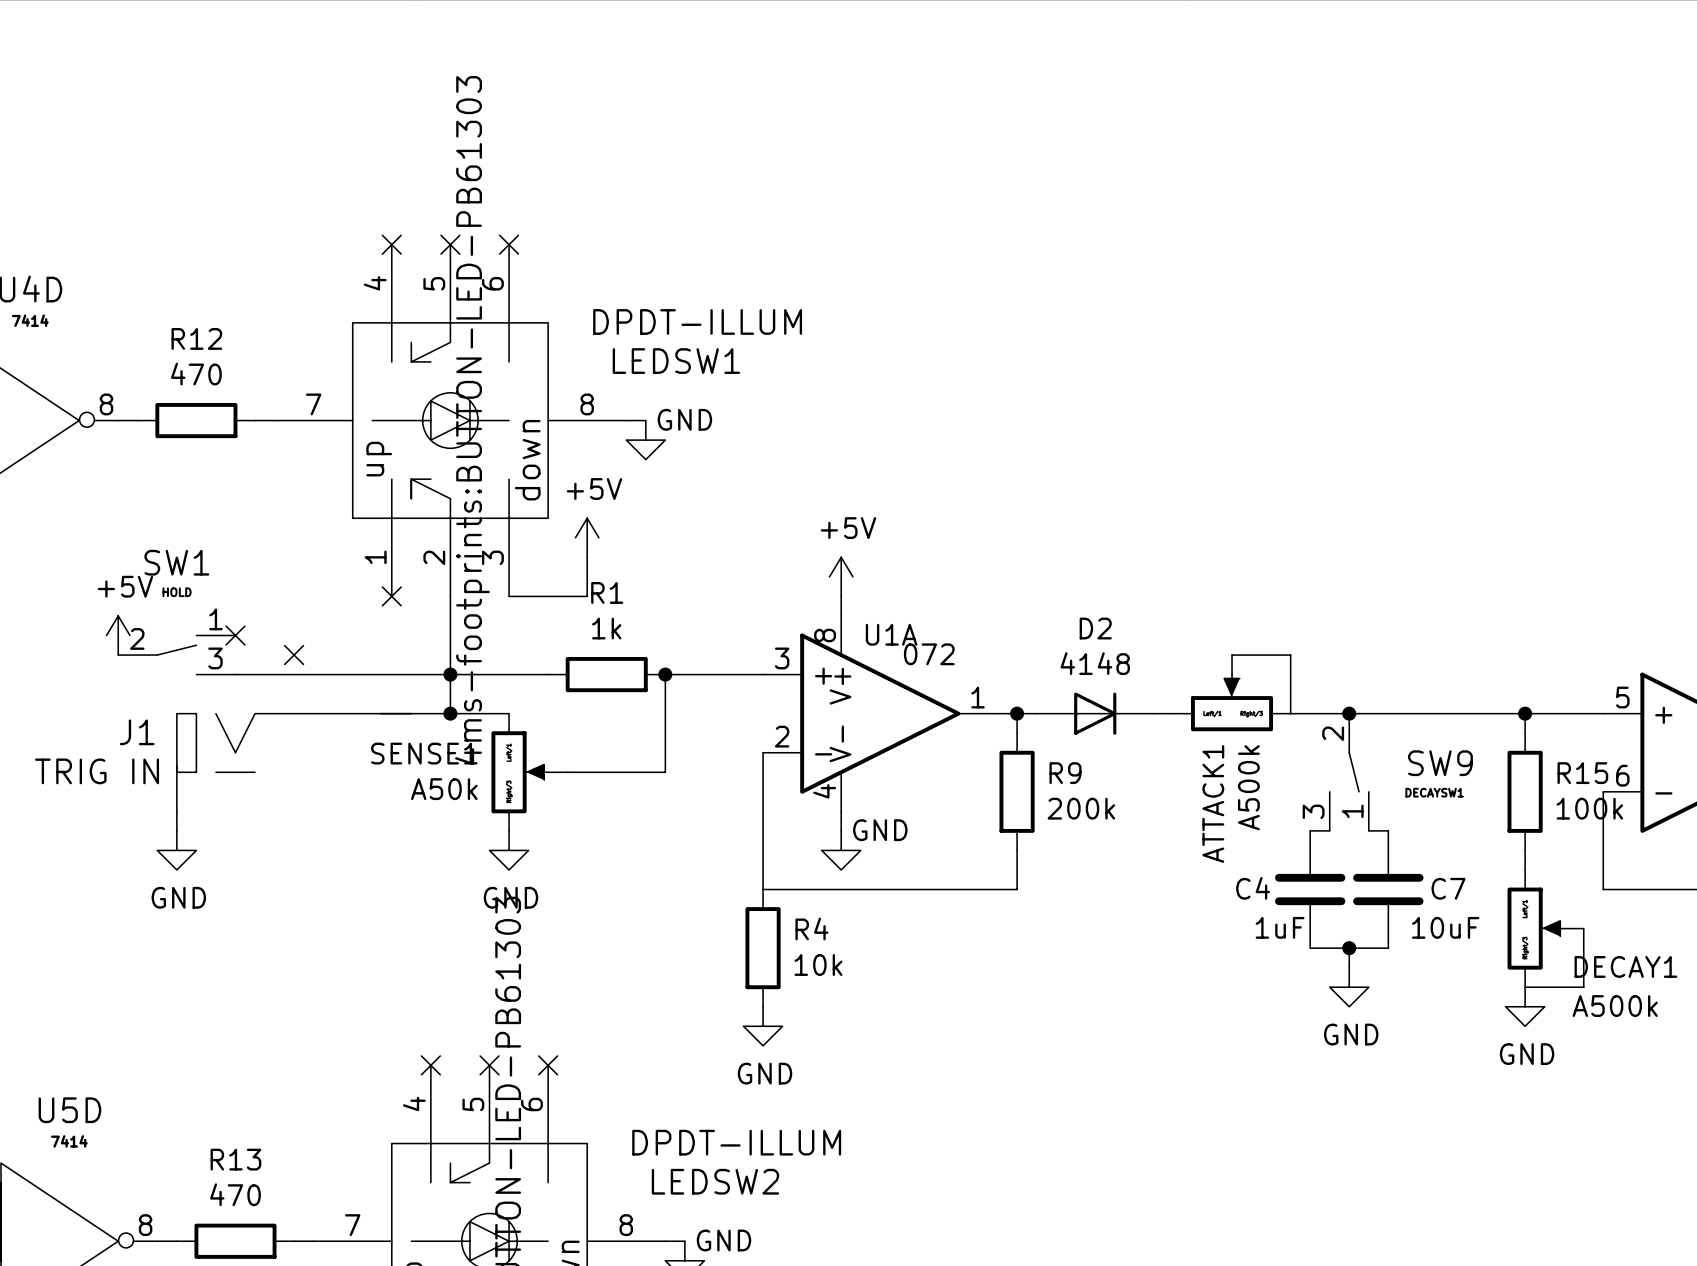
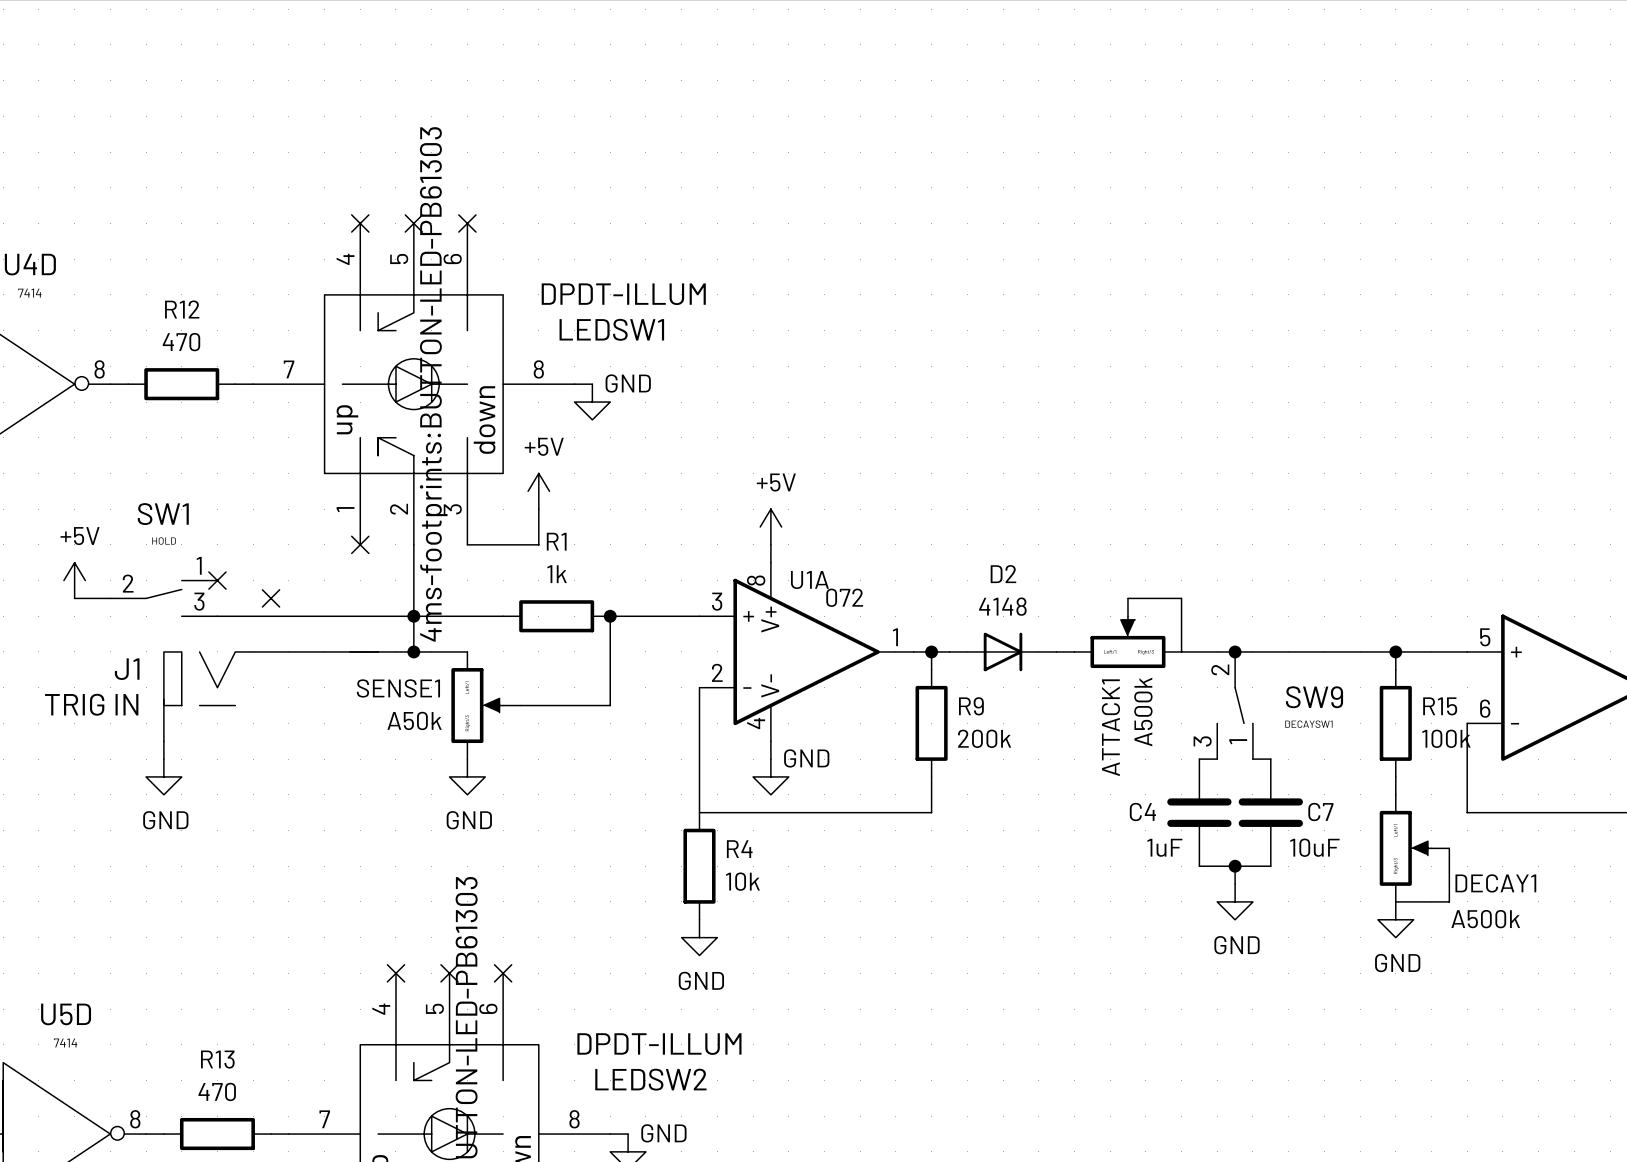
power symbol position: +5V (118, 635) -> +5V (74, 580)
wire: none -> (74, 598) (110, 598)

